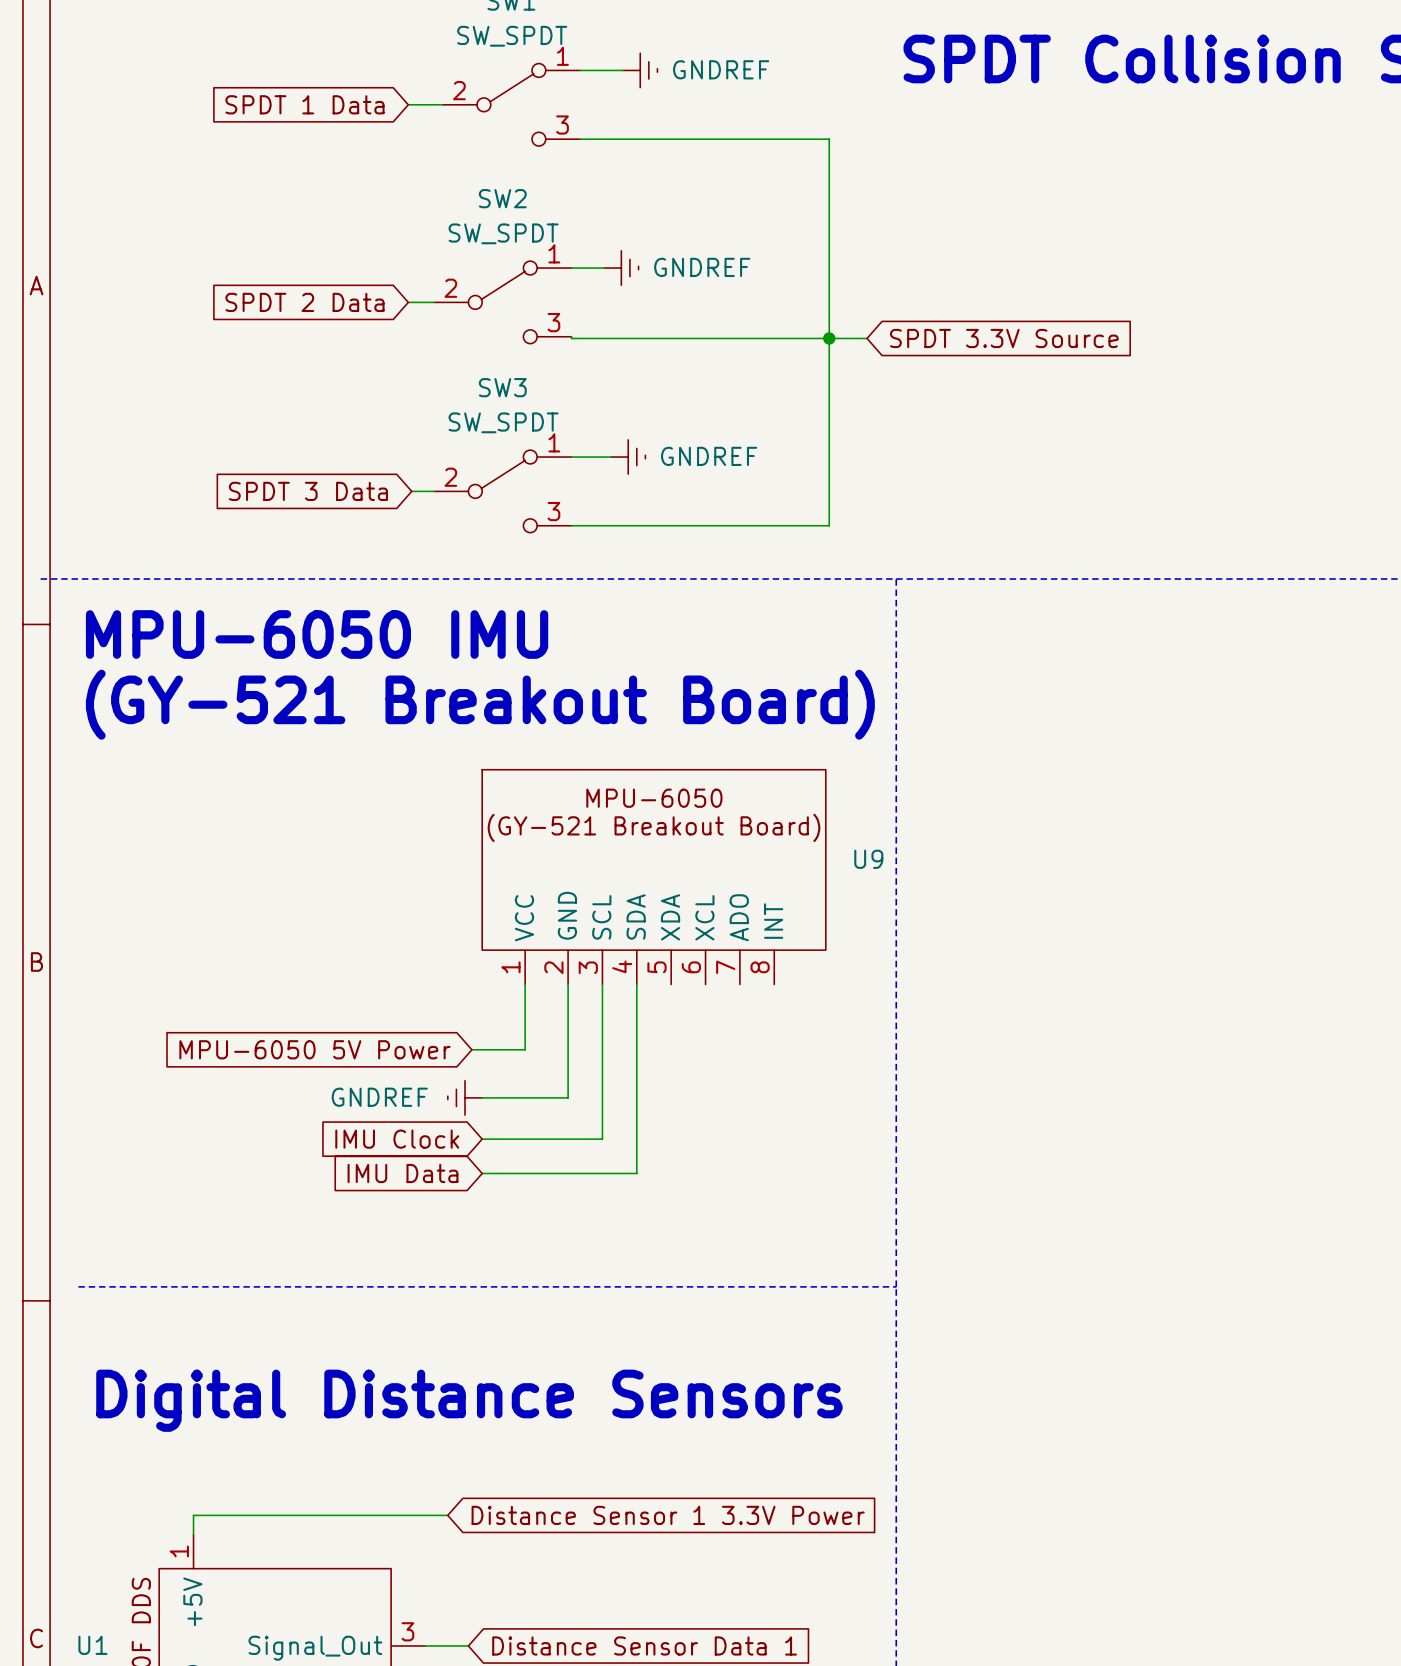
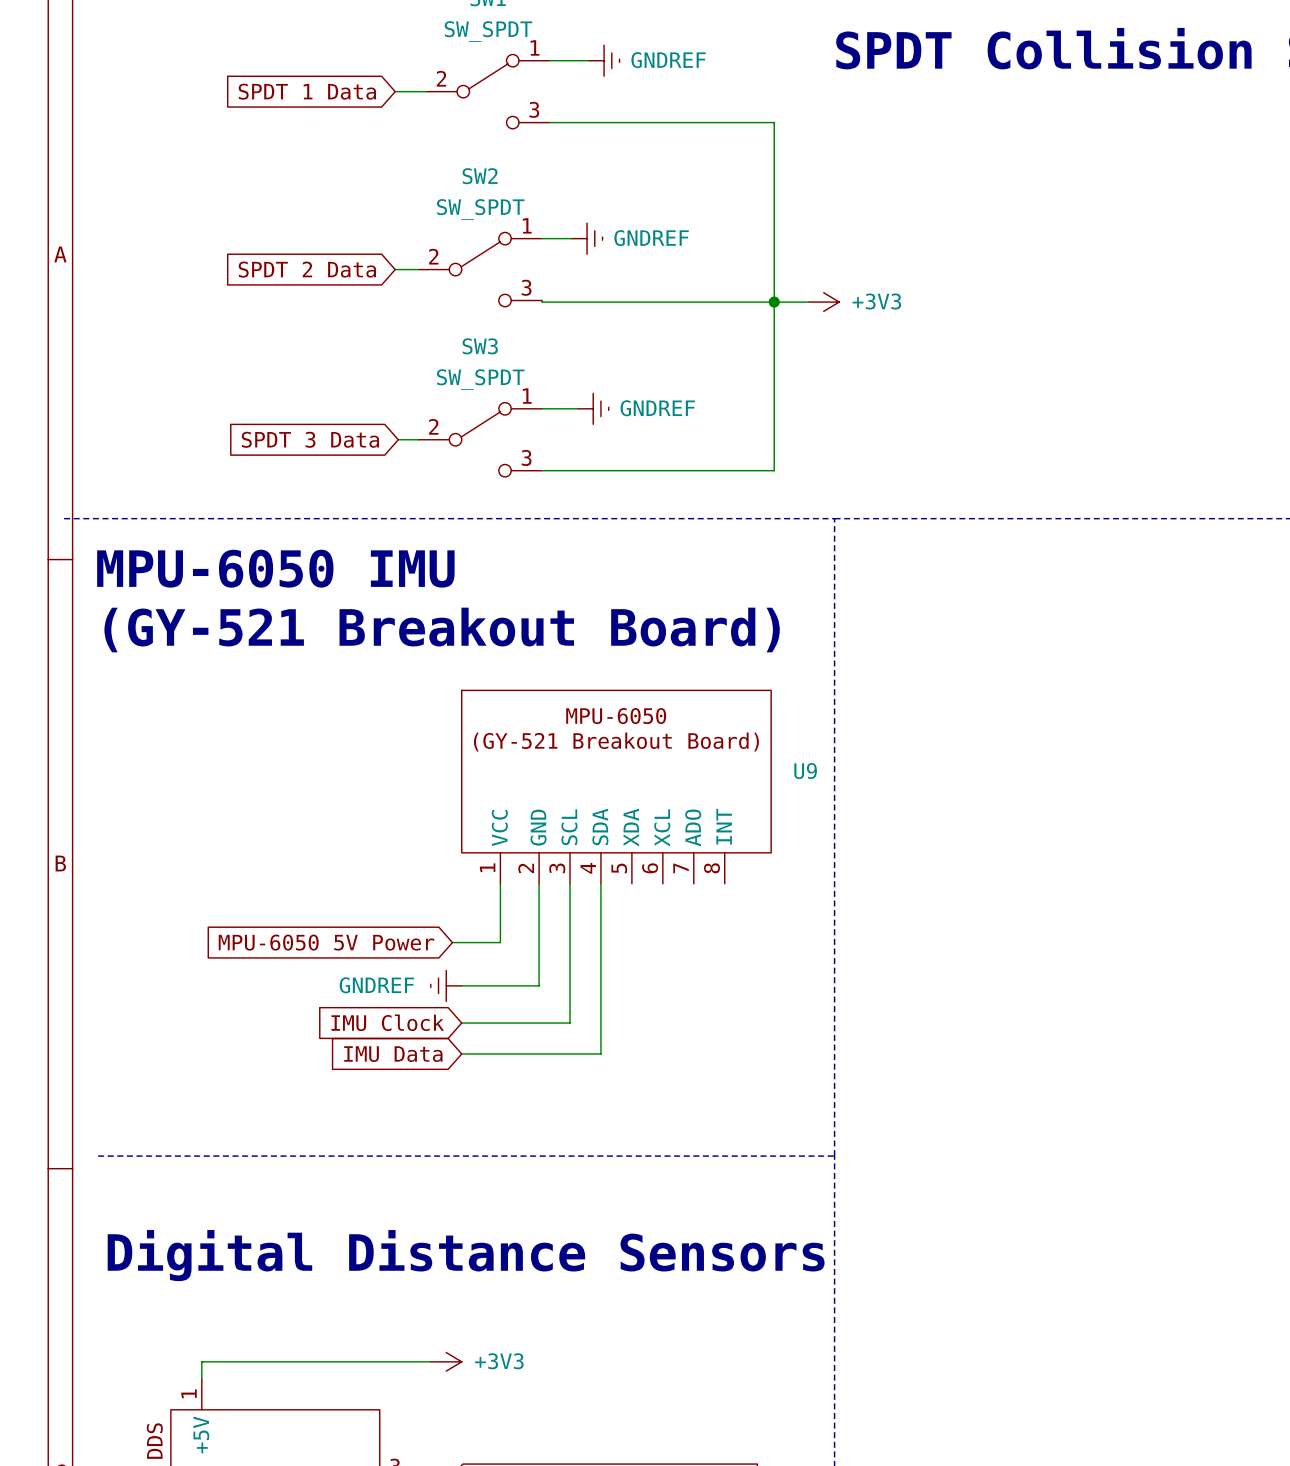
power symbol: none -> +3V3 (823, 302)
global label: SPDT 3.3V Source (1004, 338) -> none
power symbol: none -> +3V3 (446, 1361)
global label: Distance Sensor 1 3.3V Power (668, 1515) -> none

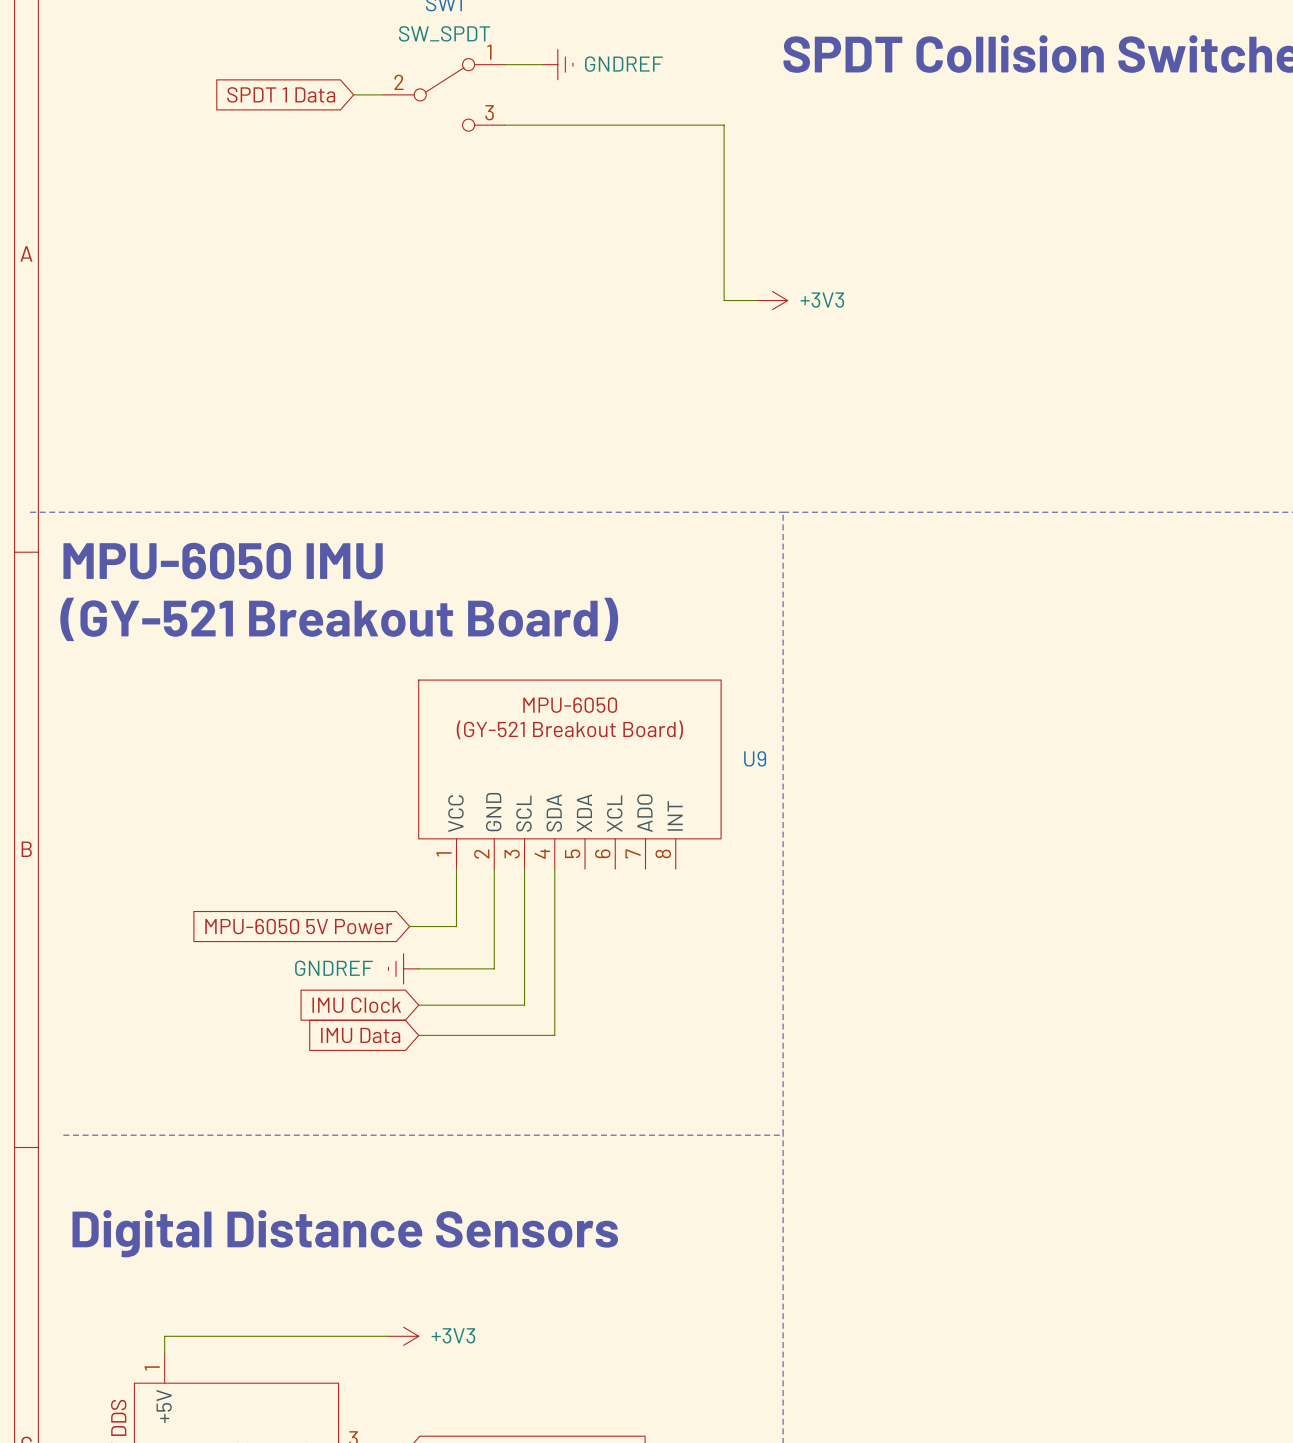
wire: (542, 238) (571, 238) -> none
power symbol: GNDREF (587, 238) -> none
global label: SPDT 2 Data (307, 269) -> none
wire: (395, 269) (418, 269) -> none
SW2: SW_SPDT (480, 269) -> none
wire: (542, 300) (542, 302) (774, 302) (774, 470) (542, 470) -> none
junction: (774, 302) -> none
wire: (542, 408) (577, 408) -> none
power symbol: GNDREF (593, 408) -> none
global label: SPDT 3 Data (310, 439) -> none
wire: (398, 439) (418, 439) -> none
SW3: SW_SPDT (480, 439) -> none

